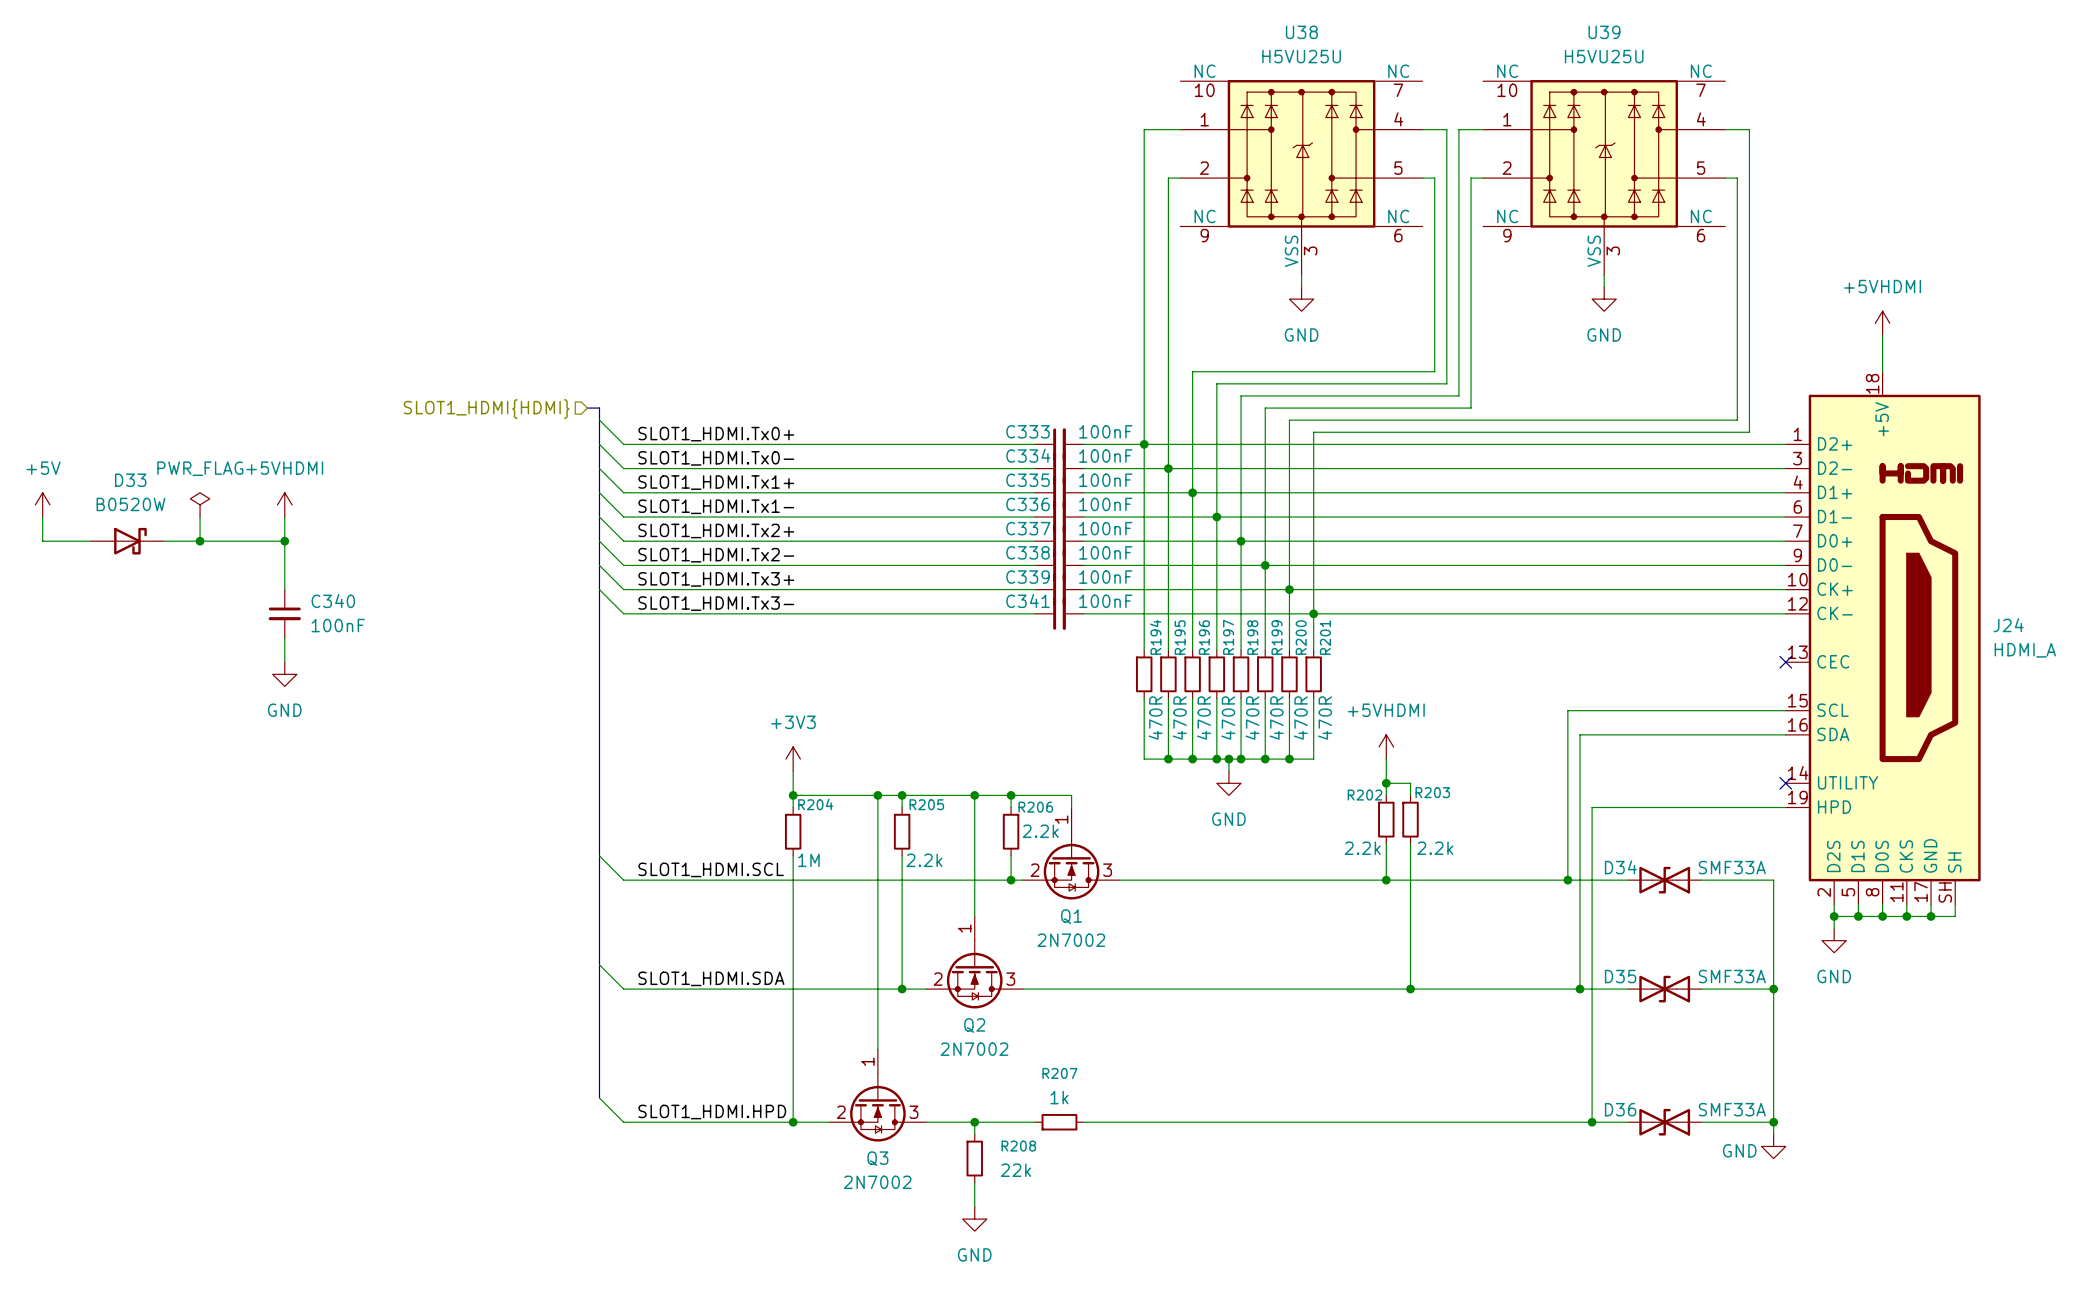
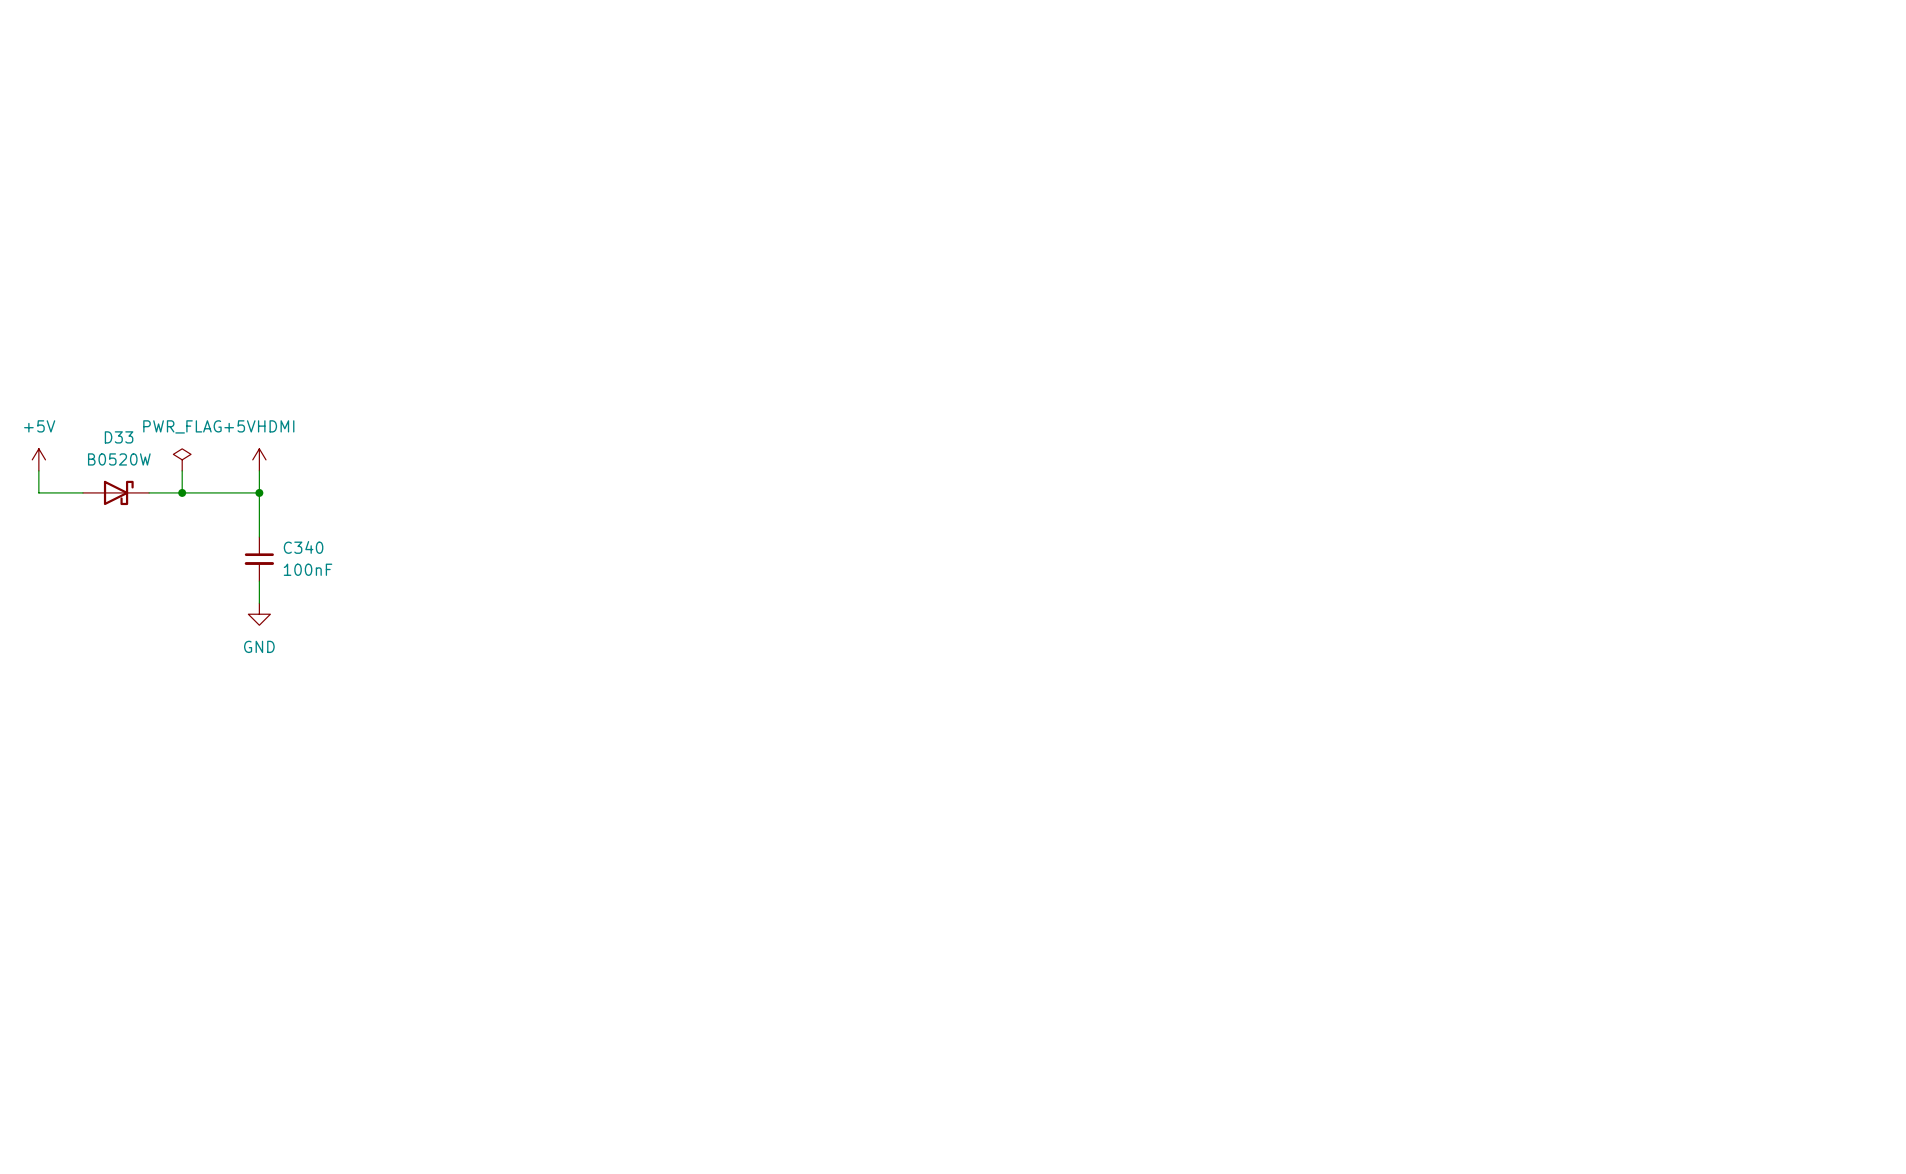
wire: (1180, 129) (1144, 129) (1144, 650) -> none
wire: (1422, 129) (1446, 129) (1446, 383) (1216, 383) (1216, 650) -> none
wire: (1483, 129) (1458, 129) (1458, 395) (1241, 395) (1241, 650) -> none
wire: (1725, 129) (1749, 129) (1749, 432) (1313, 432) (1313, 650) -> none
U38: H5VU25U (1301, 177) -> none
U39: H5VU25U (1604, 177) -> none
wire: (1180, 178) (1168, 178) (1168, 650) -> none
wire: (1422, 178) (1434, 178) (1434, 371) (1192, 371) (1192, 650) -> none
wire: (1483, 178) (1471, 178) (1471, 408) (1265, 408) (1265, 650) -> none
wire: (1725, 178) (1737, 178) (1737, 420) (1289, 420) (1289, 650) -> none
wire: (1301, 274) (1301, 287) -> none
wire: (1604, 274) (1604, 287) -> none
power symbol: GND (1301, 299) -> none
power symbol: GND (1604, 299) -> none
power symbol: +5VHDMI (1882, 323) -> none
wire: (1882, 335) (1882, 371) -> none
bus: (587, 408) (599, 408) (599, 1098) -> none
hierarchical label: SLOT1_HDMI{HDMI} (486, 409) -> none
wire: (599, 420) (623, 444) (1035, 444) -> none
label: SLOT1_HDMI.Tx0+ (716, 434) -> none
wire: (599, 444) (623, 468) (1035, 468) -> none
C333: 100nF (1059, 444) -> none
wire: (1083, 444) (1785, 444) -> none
junction: (1144, 444) -> none
label: SLOT1_HDMI.Tx0- (716, 458) -> none
wire: (599, 468) (623, 492) (1035, 492) -> none
C334: 100nF (1059, 468) -> none
wire: (1083, 468) (1785, 468) -> none
junction: (1168, 468) -> none
label: SLOT1_HDMI.Tx1+ (716, 482) -> none
wire: (599, 492) (623, 517) (1035, 517) -> none
C335: 100nF (1059, 492) -> none
wire: (1083, 492) (1785, 492) -> none
junction: (1192, 492) -> none
label: SLOT1_HDMI.Tx1- (716, 506) -> none
wire: (599, 517) (623, 541) (1035, 541) -> none
C336: 100nF (1059, 517) -> none
wire: (1083, 517) (1785, 517) -> none
junction: (1216, 517) -> none
label: SLOT1_HDMI.Tx2+ (716, 530) -> none
wire: (599, 541) (623, 565) (1035, 565) -> none
C337: 100nF (1059, 541) -> none
wire: (1083, 541) (1785, 541) -> none
junction: (1241, 541) -> none
label: SLOT1_HDMI.Tx2- (716, 555) -> none
wire: (599, 565) (623, 589) (1035, 589) -> none
C338: 100nF (1059, 565) -> none
wire: (1083, 565) (1785, 565) -> none
junction: (1265, 565) -> none
label: SLOT1_HDMI.Tx3+ (716, 579) -> none
wire: (599, 589) (623, 613) (1035, 613) -> none
C339: 100nF (1059, 589) -> none
wire: (1083, 589) (1785, 589) -> none
junction: (1289, 589) -> none
label: SLOT1_HDMI.Tx3- (716, 603) -> none
C341: 100nF (1059, 613) -> none
wire: (1083, 613) (1785, 613) -> none
junction: (1313, 613) -> none
J24: HDMI_A (1883, 638) -> none
no-connect mark: (1785, 662) -> none
R194: 470R (1144, 674) -> none
R195: 470R (1168, 674) -> none
R196: 470R (1192, 674) -> none
R197: 470R (1216, 674) -> none
R198: 470R (1241, 674) -> none
R199: 470R (1265, 674) -> none
R200: 470R (1289, 674) -> none
R201: 470R (1313, 674) -> none
wire: (1144, 698) (1144, 759) (1313, 759) (1313, 698) -> none
wire: (1168, 698) (1168, 759) -> none
wire: (1192, 698) (1192, 759) -> none
wire: (1216, 698) (1216, 759) -> none
wire: (1241, 698) (1241, 759) -> none
wire: (1265, 698) (1265, 759) -> none
wire: (1289, 698) (1289, 759) -> none
wire: (1785, 710) (1567, 710) (1567, 880) -> none
wire: (1785, 734) (1579, 734) (1579, 989) -> none
power symbol: +5VHDMI (1386, 746) -> none
power symbol: +3V3 (793, 759) -> none
junction: (1168, 759) -> none
junction: (1192, 759) -> none
junction: (1216, 759) -> none
wire: (1228, 759) (1228, 771) -> none
junction: (1228, 759) -> none
junction: (1241, 759) -> none
junction: (1265, 759) -> none
junction: (1289, 759) -> none
wire: (1386, 759) (1386, 795) -> none
wire: (793, 771) (793, 807) -> none
power symbol: GND (1228, 783) -> none
wire: (1386, 783) (1410, 783) (1410, 795) -> none
junction: (1386, 783) -> none
no-connect mark: (1785, 783) -> none
wire: (793, 795) (1071, 795) (1071, 807) -> none
junction: (793, 795) -> none
wire: (877, 795) (877, 1049) -> none
junction: (877, 795) -> none
wire: (902, 795) (902, 807) -> none
junction: (902, 795) -> none
wire: (974, 795) (974, 916) -> none
junction: (974, 795) -> none
wire: (1011, 795) (1011, 807) -> none
junction: (1011, 795) -> none
wire: (1785, 807) (1592, 807) (1592, 1122) -> none
R202: 2.2k (1386, 819) -> none
R203: 2.2k (1410, 819) -> none
R204: 1M (793, 831) -> none
R205: 2.2k (902, 831) -> none
R206: 2.2k (1011, 831) -> none
wire: (1386, 843) (1386, 880) -> none
wire: (1410, 843) (1410, 989) -> none
Q1: 2N7002 (1071, 853) -> none
wire: (599, 855) (623, 880) (1023, 880) -> none
wire: (793, 855) (793, 1122) -> none
wire: (902, 855) (902, 989) -> none
wire: (1011, 855) (1011, 880) -> none
label: SLOT1_HDMI.SCL (711, 869) -> none
junction: (1011, 880) -> none
wire: (1119, 880) (1628, 880) -> none
junction: (1386, 880) -> none
junction: (1567, 880) -> none
D34: SMF33A (1664, 880) -> none
wire: (1701, 880) (1773, 880) (1773, 1134) -> none
wire: (1834, 904) (1834, 928) -> none
wire: (1858, 904) (1858, 916) -> none
wire: (1882, 904) (1882, 916) -> none
wire: (1906, 904) (1906, 916) -> none
wire: (1931, 904) (1931, 916) -> none
wire: (1955, 904) (1955, 916) (1834, 916) -> none
junction: (1834, 916) -> none
junction: (1858, 916) -> none
junction: (1882, 916) -> none
junction: (1906, 916) -> none
junction: (1931, 916) -> none
power symbol: GND (1834, 940) -> none
Q2: 2N7002 (974, 962) -> none
wire: (599, 964) (623, 989) (926, 989) -> none
label: SLOT1_HDMI.SDA (711, 978) -> none
junction: (902, 989) -> none
wire: (1023, 989) (1628, 989) -> none
junction: (1410, 989) -> none
junction: (1579, 989) -> none
D35: SMF33A (1664, 989) -> none
wire: (1701, 989) (1773, 989) -> none
junction: (1773, 989) -> none
Q3: 2N7002 (877, 1095) -> none
wire: (599, 1098) (623, 1122) (829, 1122) -> none
label: SLOT1_HDMI.HPD (712, 1112) -> none
junction: (793, 1122) -> none
wire: (926, 1122) (1035, 1122) -> none
wire: (974, 1122) (974, 1134) -> none
junction: (974, 1122) -> none
R207: 1k (1059, 1122) -> none
wire: (1083, 1122) (1628, 1122) -> none
junction: (1592, 1122) -> none
D36: SMF33A (1664, 1122) -> none
wire: (1701, 1122) (1773, 1122) -> none
junction: (1773, 1122) -> none
power symbol: GND (1773, 1146) -> none
R208: 22k (974, 1158) -> none
wire: (974, 1182) (974, 1206) -> none
power symbol: GND (974, 1219) -> none

